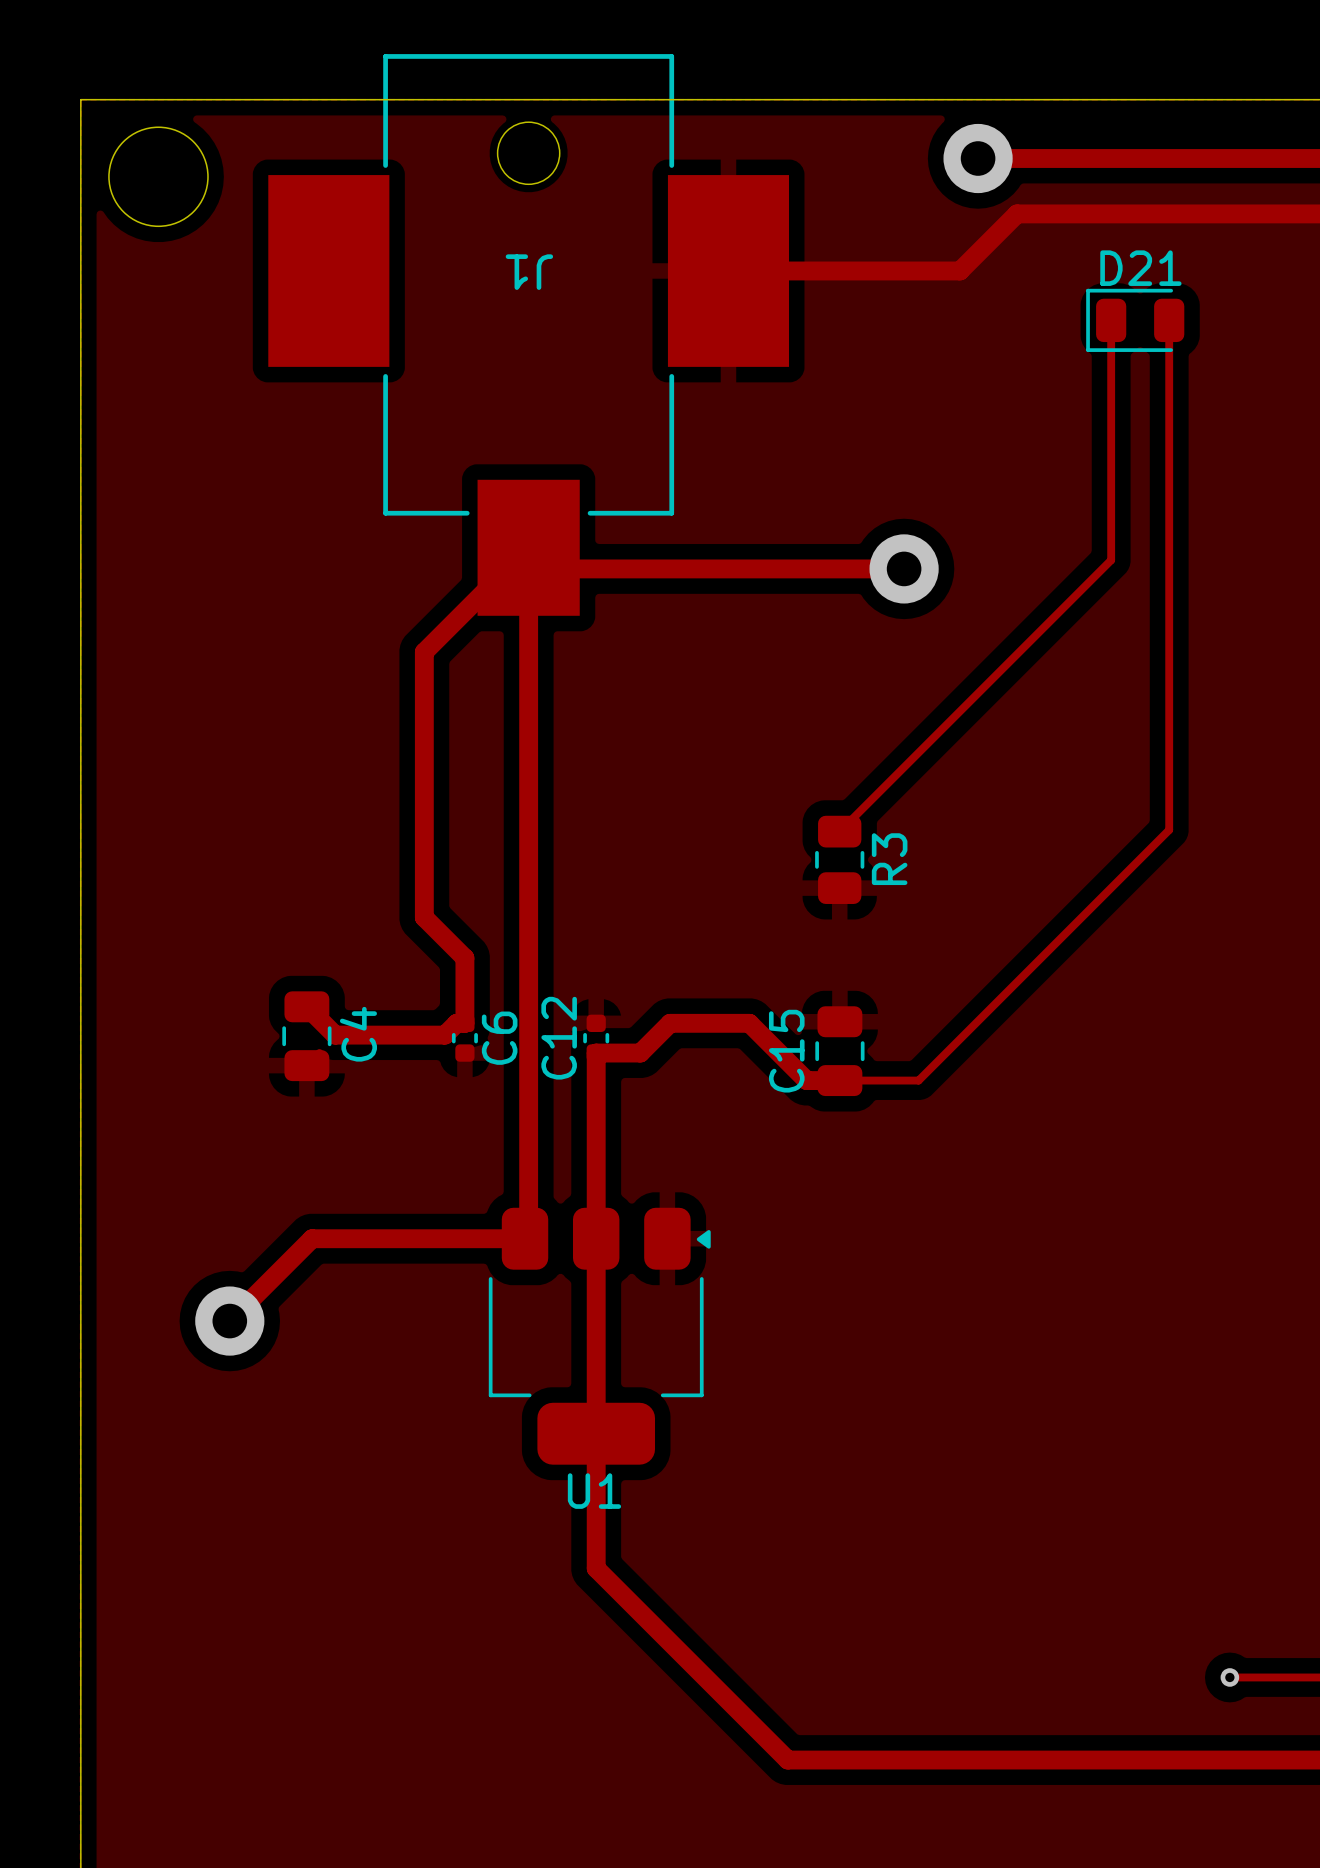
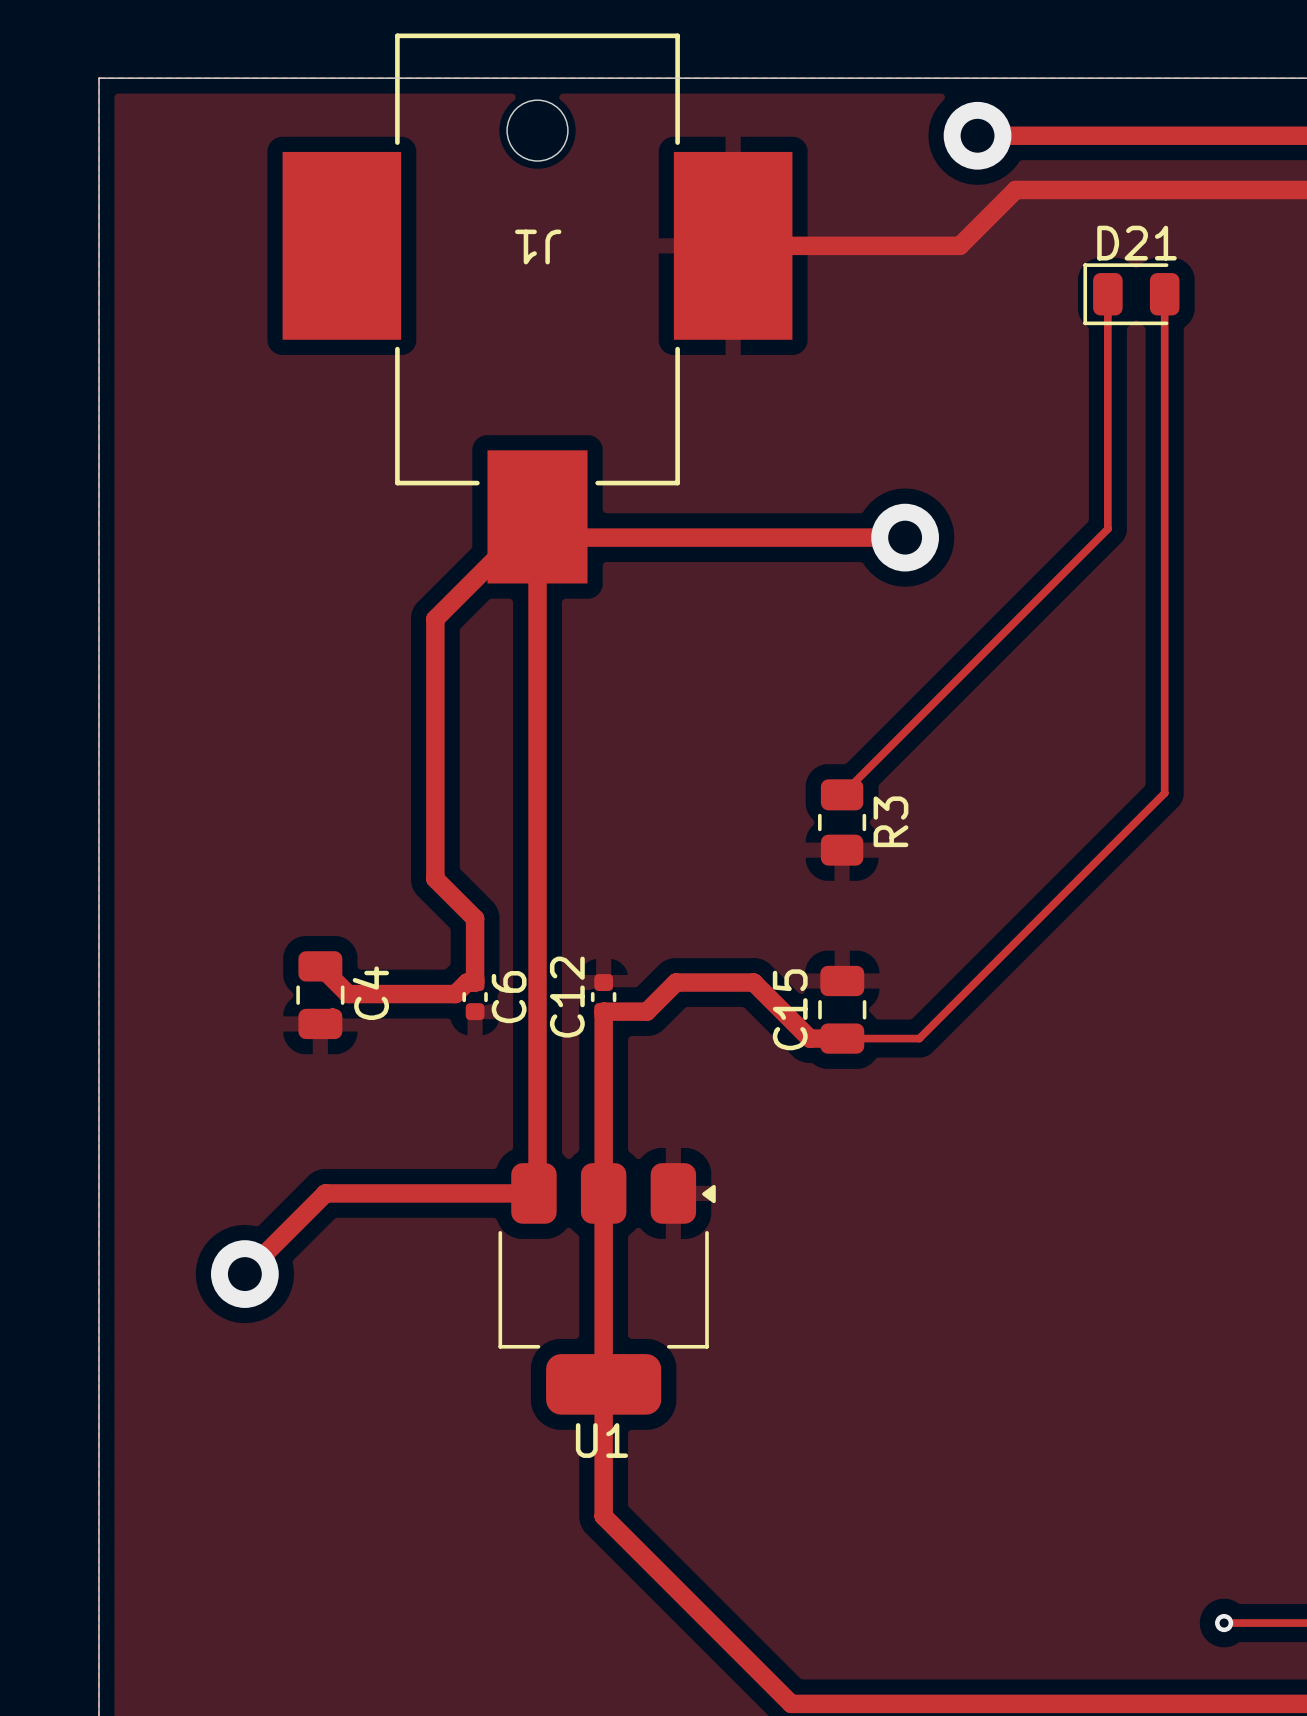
round board edge: [108, 126, 209, 228] -> none

